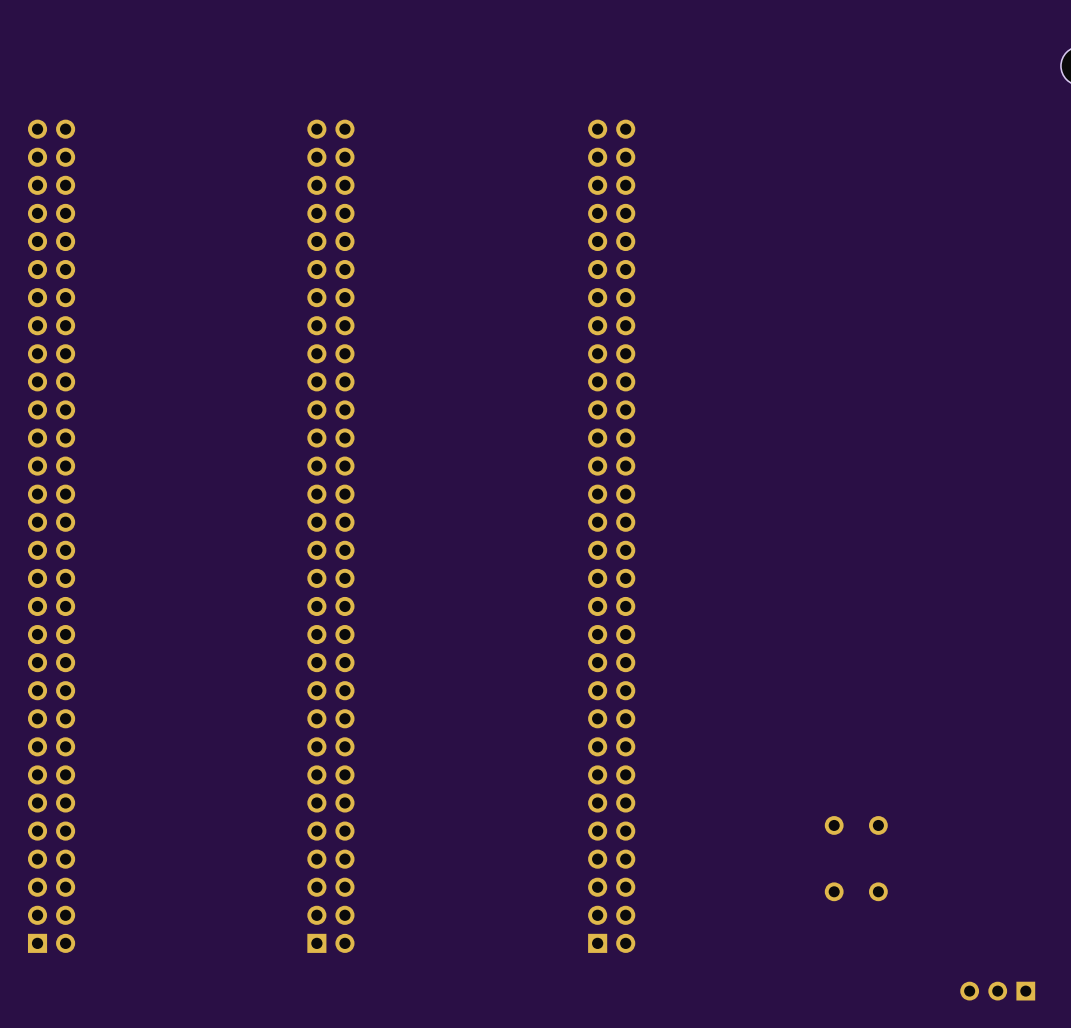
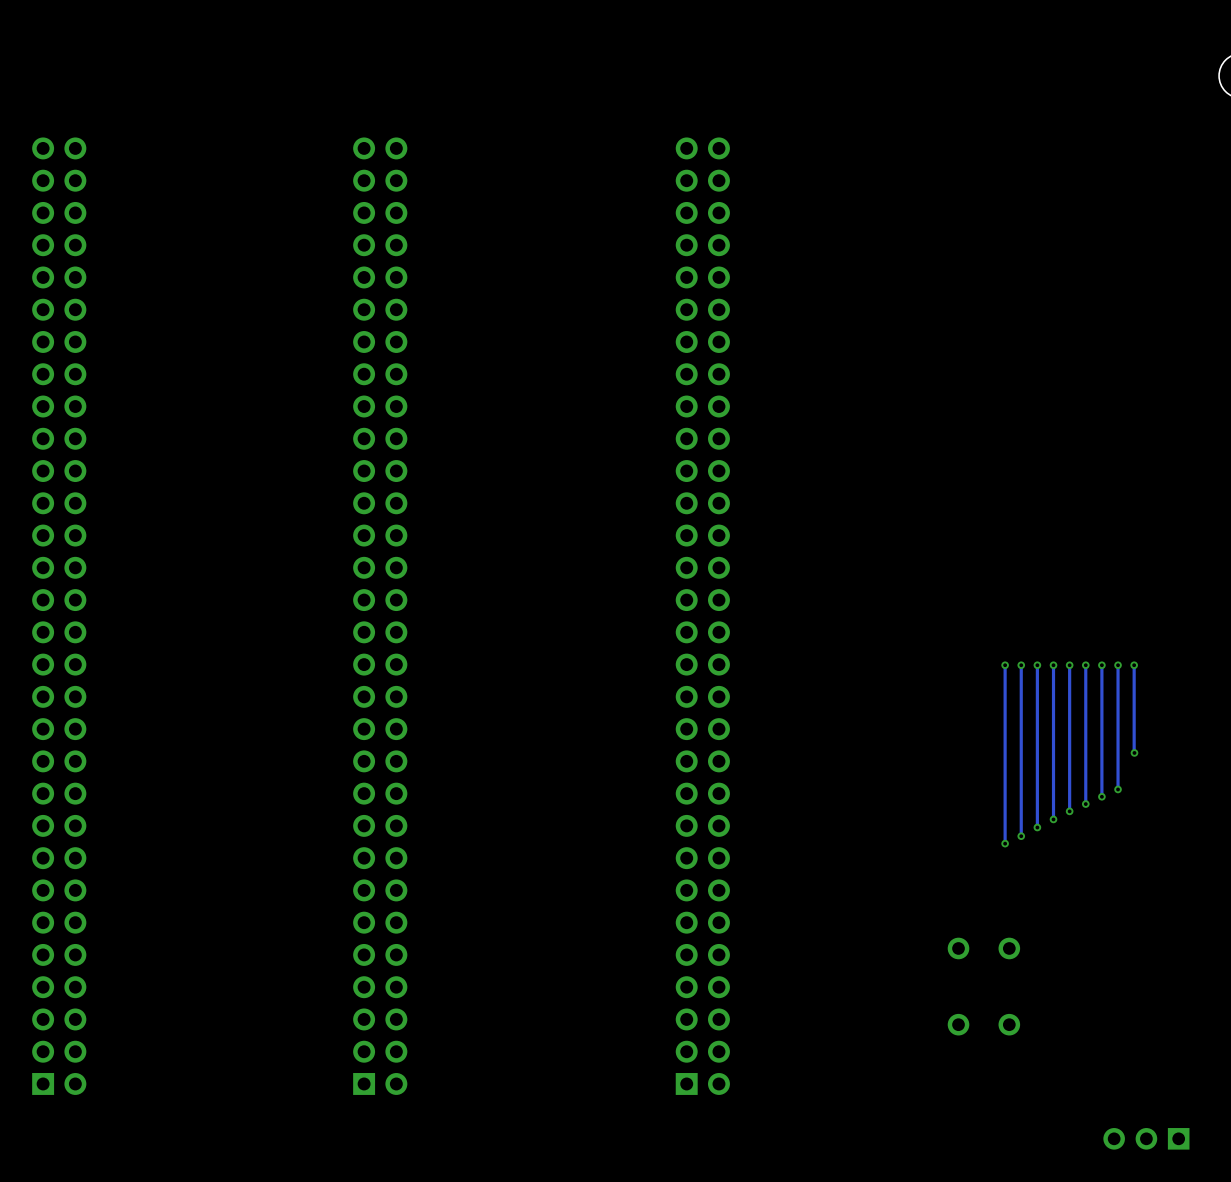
track: none -> (1005, 665) (1005, 843)
via: none -> (1005, 665)
track: none -> (1021, 665) (1021, 836)
via: none -> (1021, 665)
track: none -> (1037, 665) (1037, 827)
via: none -> (1037, 665)
track: none -> (1053, 665) (1053, 819)
via: none -> (1053, 665)
track: none -> (1069, 665) (1069, 811)
via: none -> (1069, 665)
track: none -> (1085, 665) (1085, 804)
via: none -> (1085, 665)
track: none -> (1101, 665) (1101, 796)
via: none -> (1101, 665)
track: none -> (1118, 665) (1118, 789)
via: none -> (1118, 665)
track: none -> (1134, 665) (1134, 752)
via: none -> (1134, 665)
via: none -> (1134, 752)
via: none -> (1118, 789)
via: none -> (1101, 796)
via: none -> (1085, 804)
via: none -> (1069, 811)
via: none -> (1053, 819)
via: none -> (1037, 827)
via: none -> (1021, 836)
via: none -> (1005, 843)

